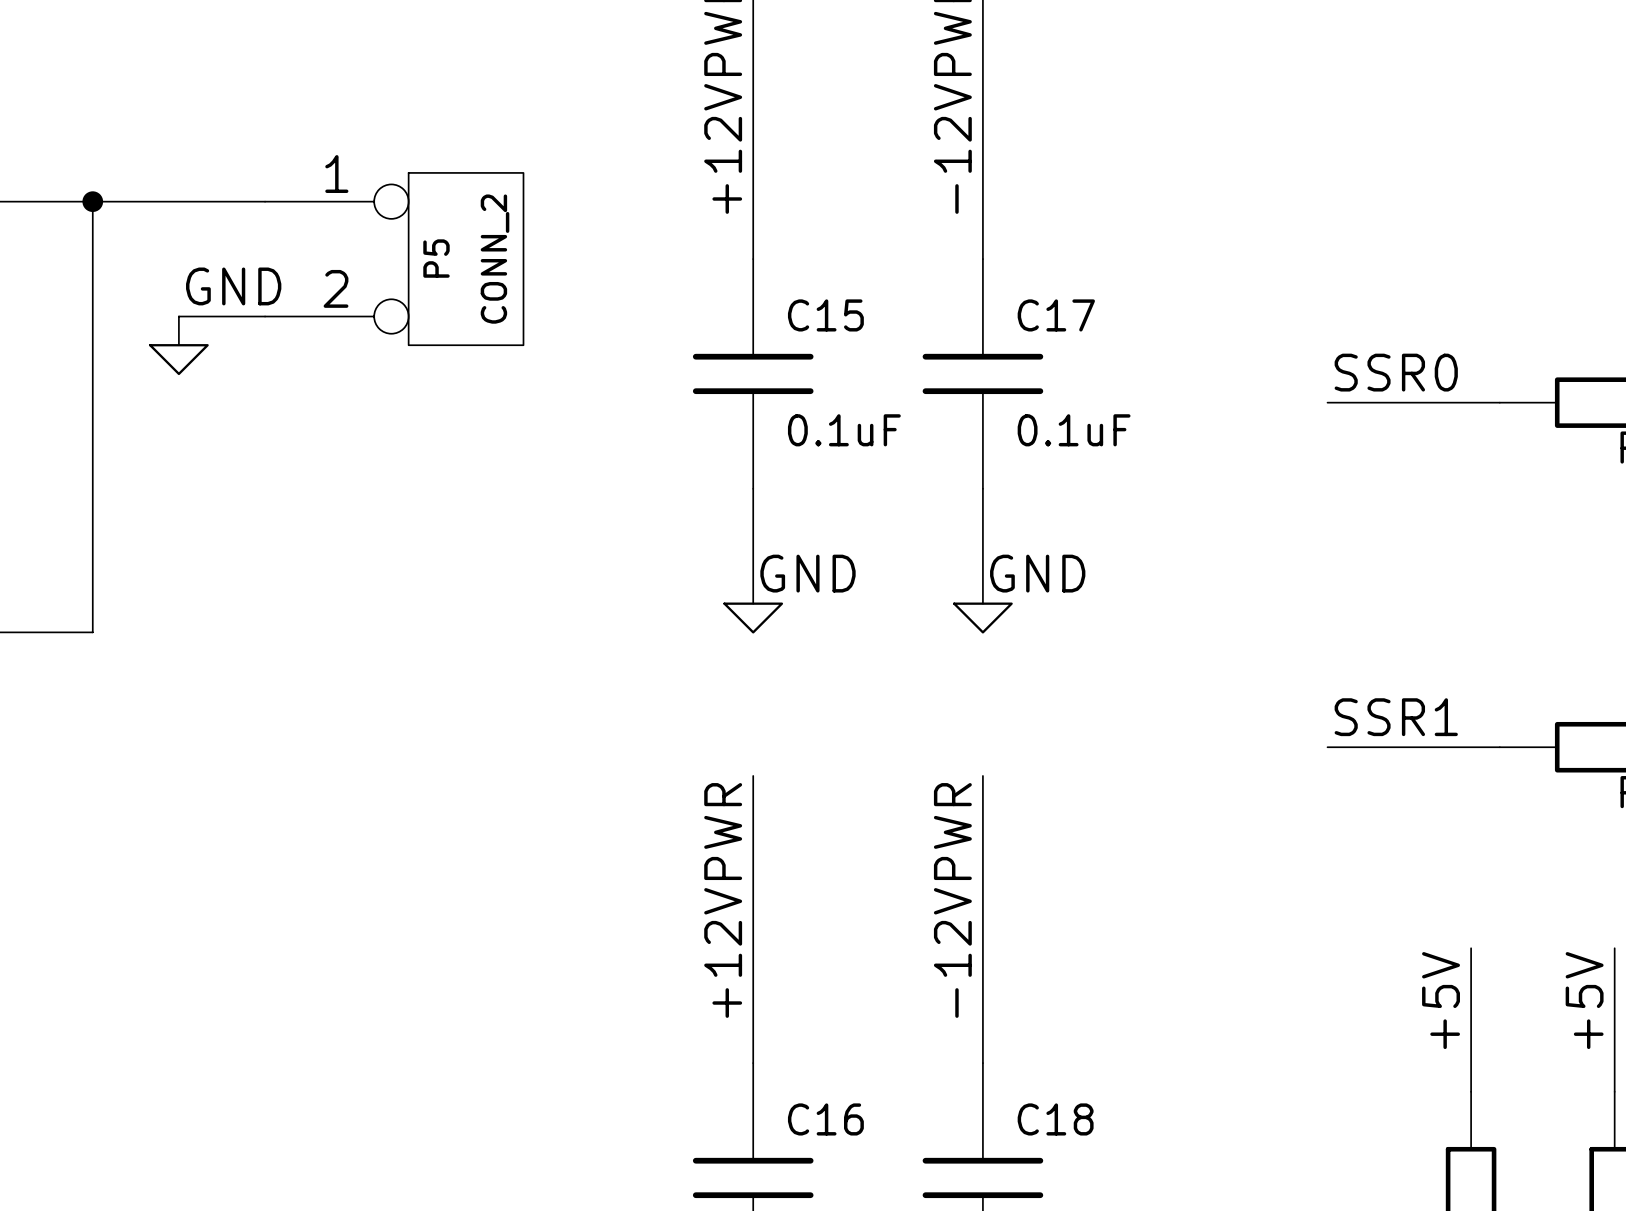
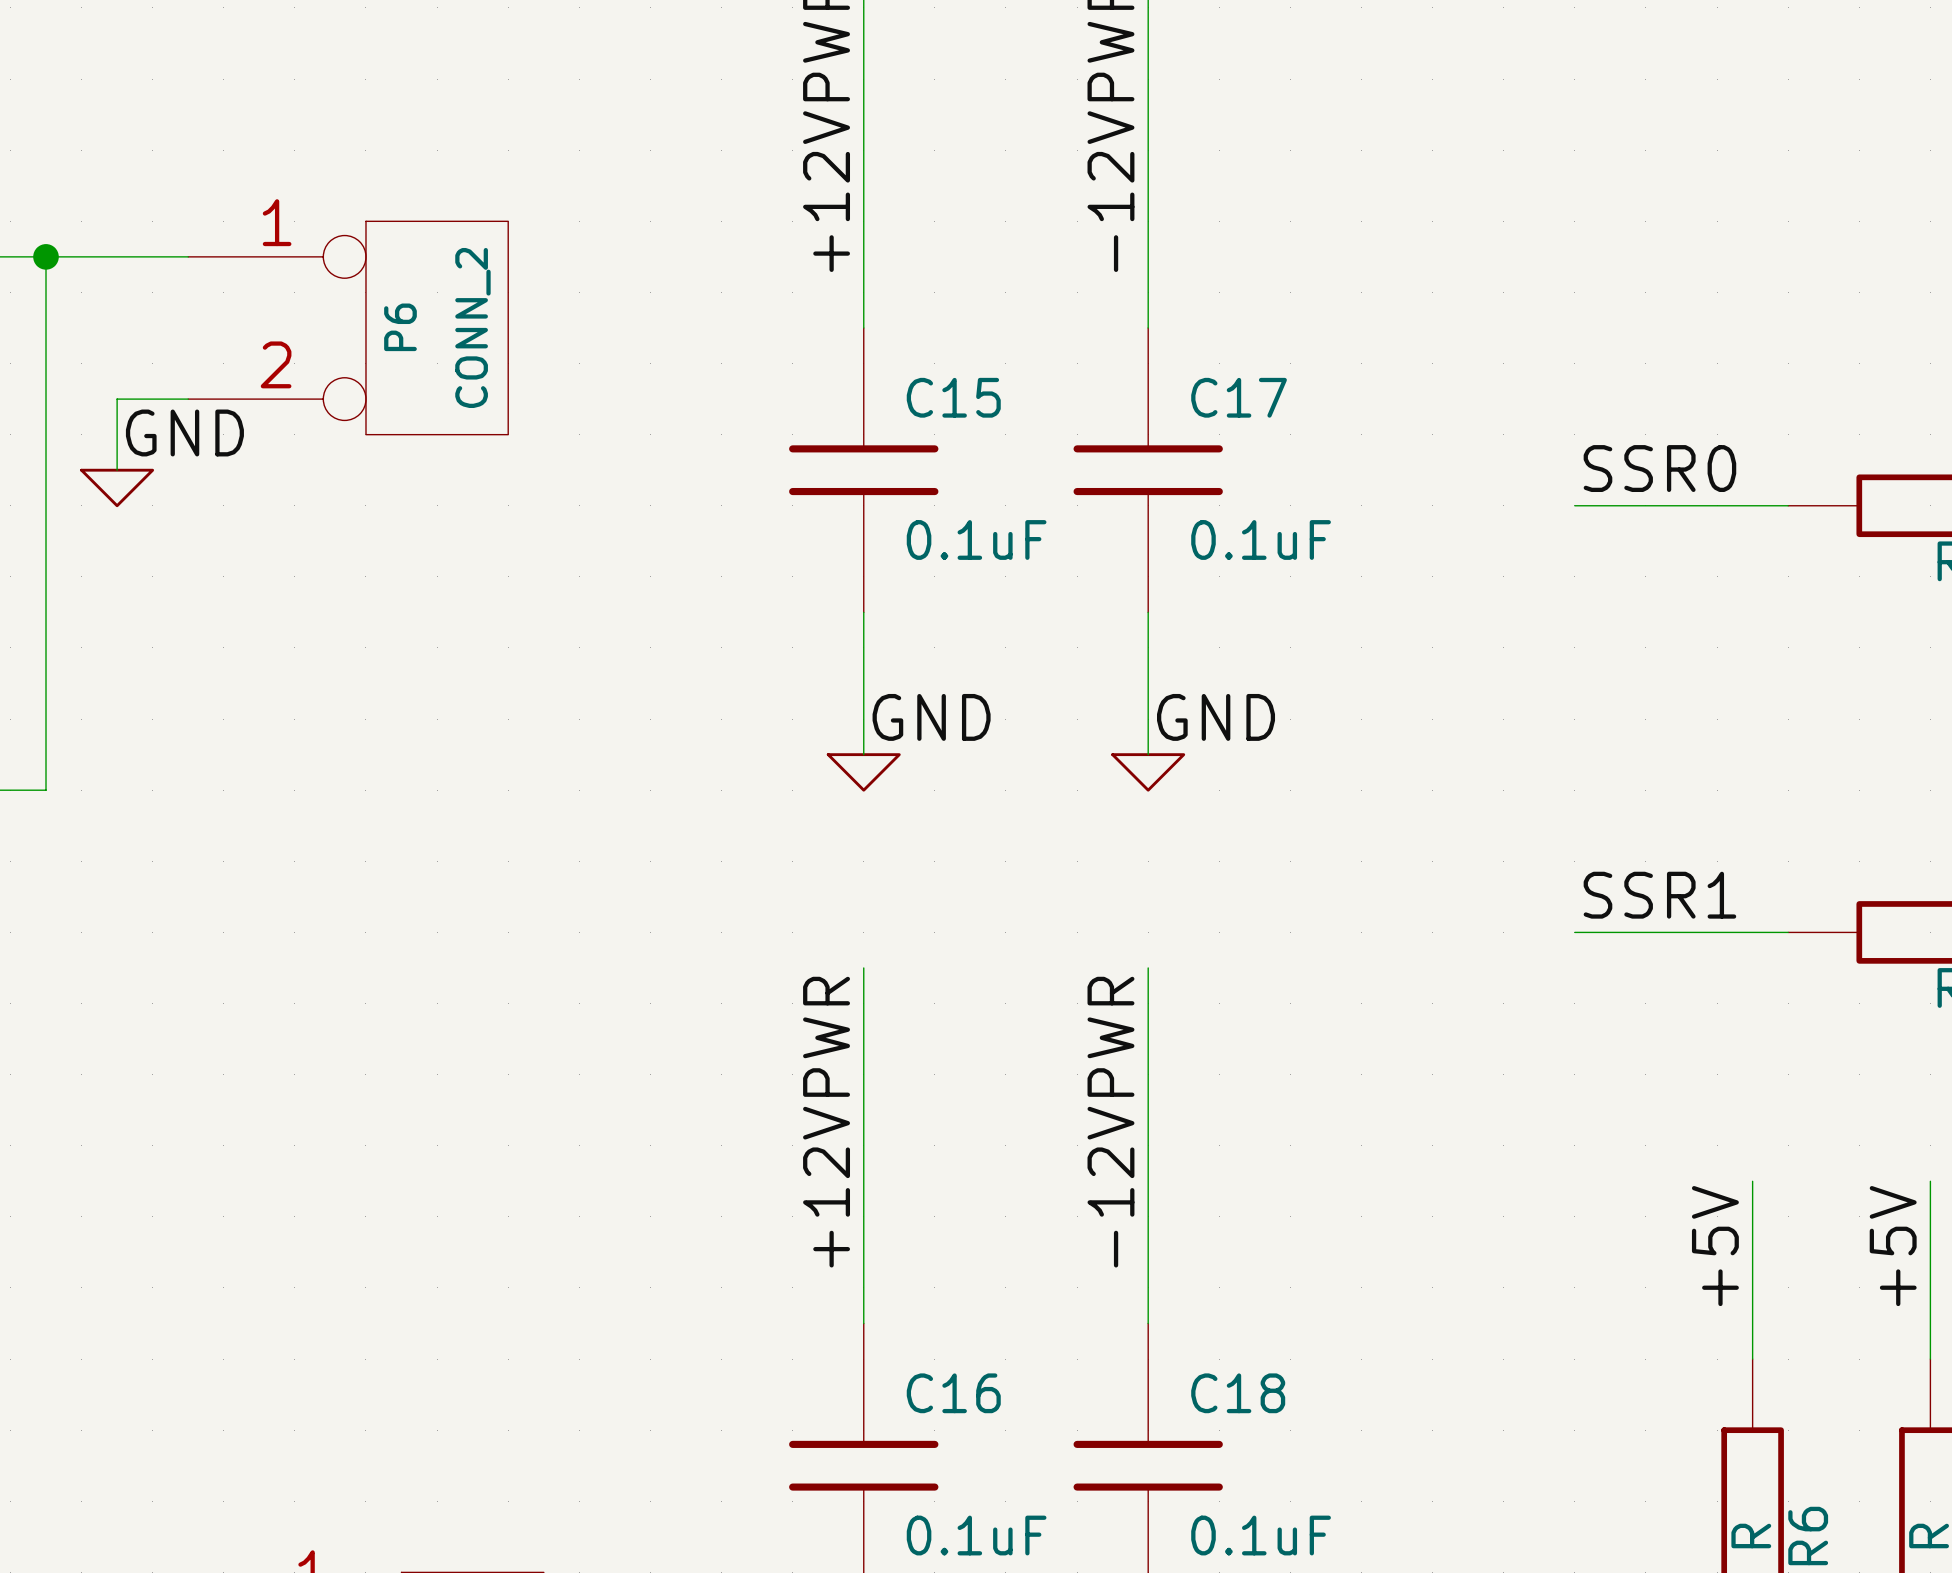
P6: none -> CONN_2 (348, 327)
P5: CONN_2 (394, 259) -> none
label position: GND (233, 286) -> GND (184, 432)
wire: (178, 316) (178, 345) -> (152, 399) (117, 399) (117, 470)
power symbol position: (178, 359) -> (117, 487)

